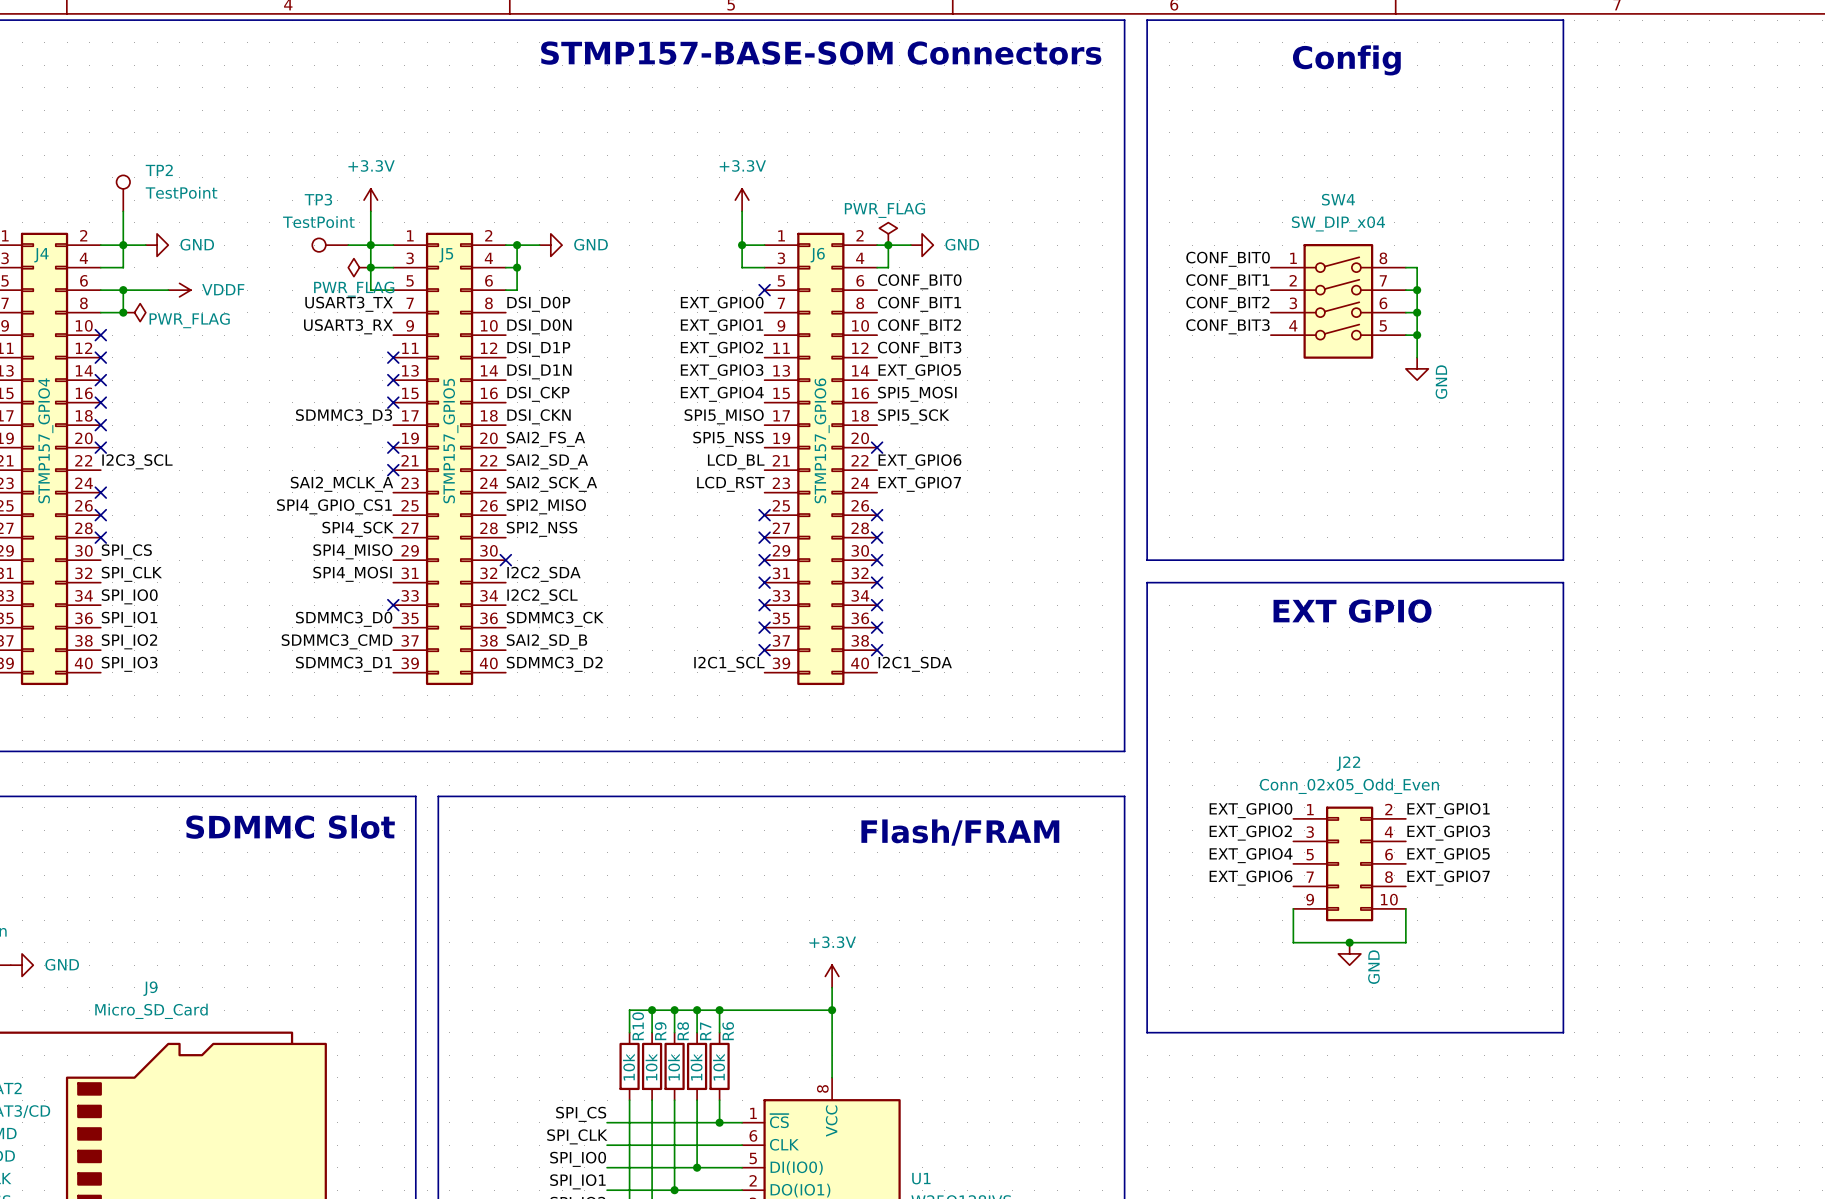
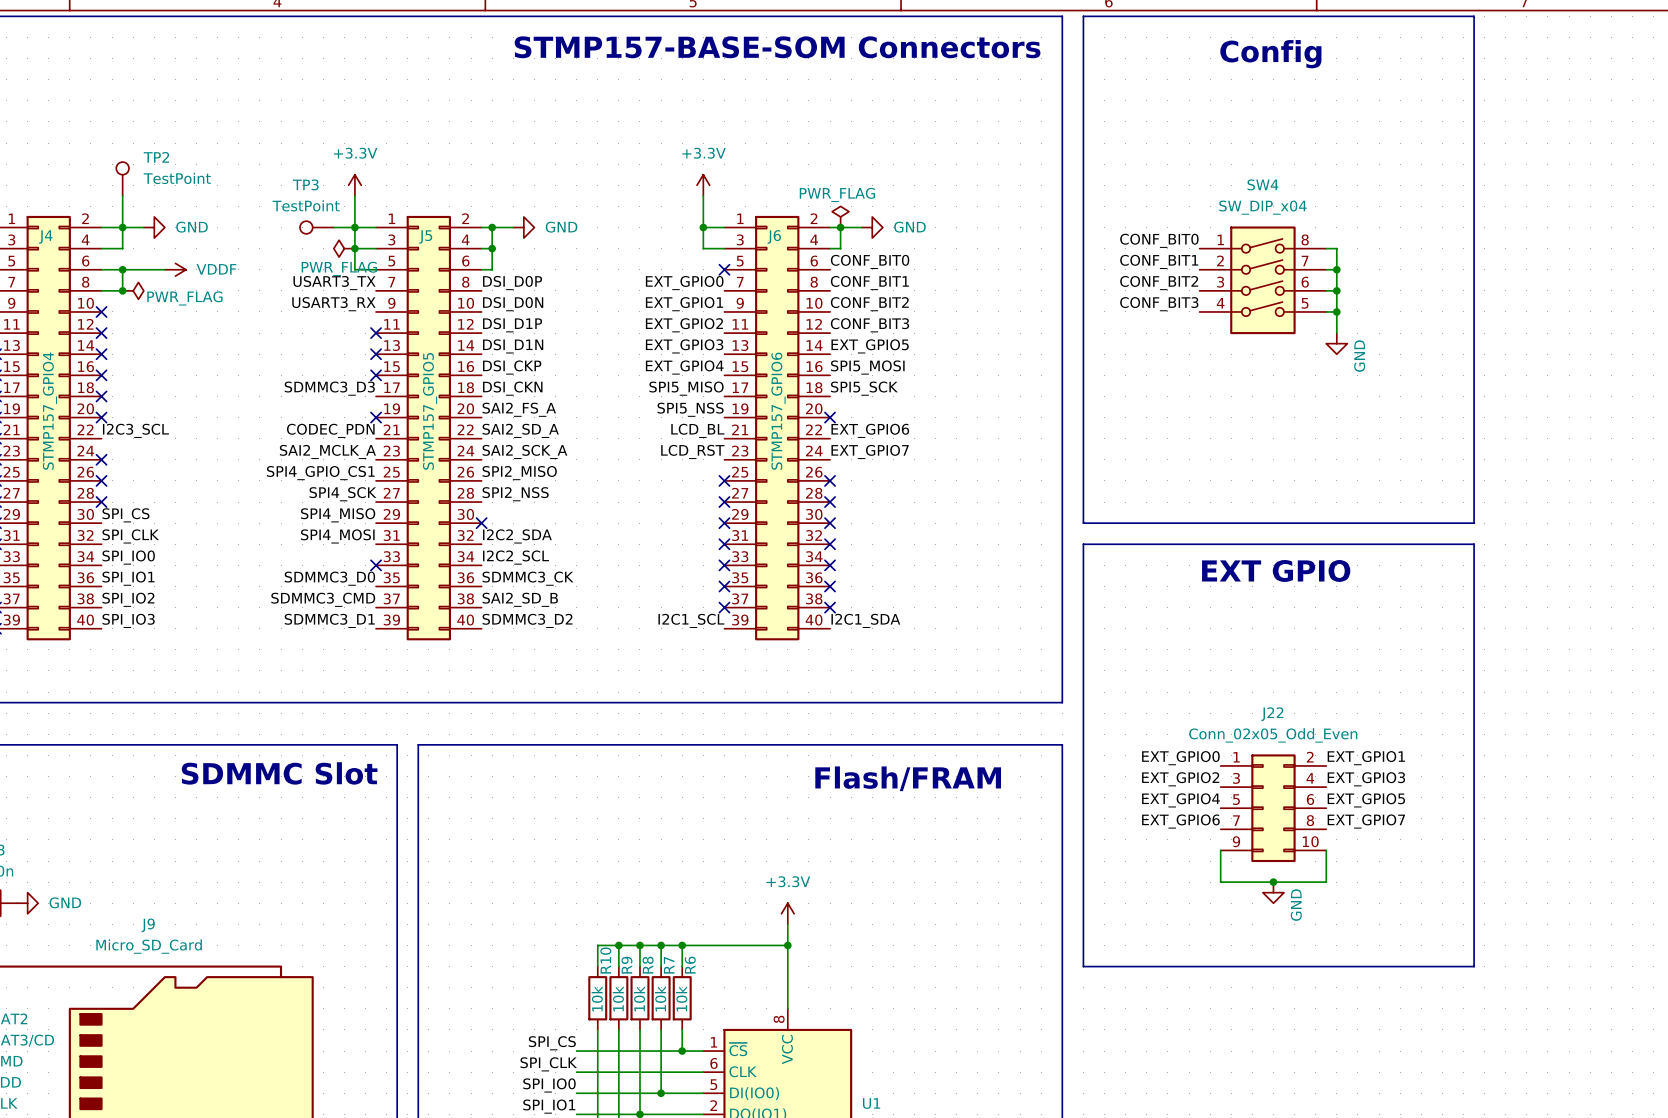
label: none -> CODEC_PDN (330, 430)
no-connect mark: (393, 470) -> none

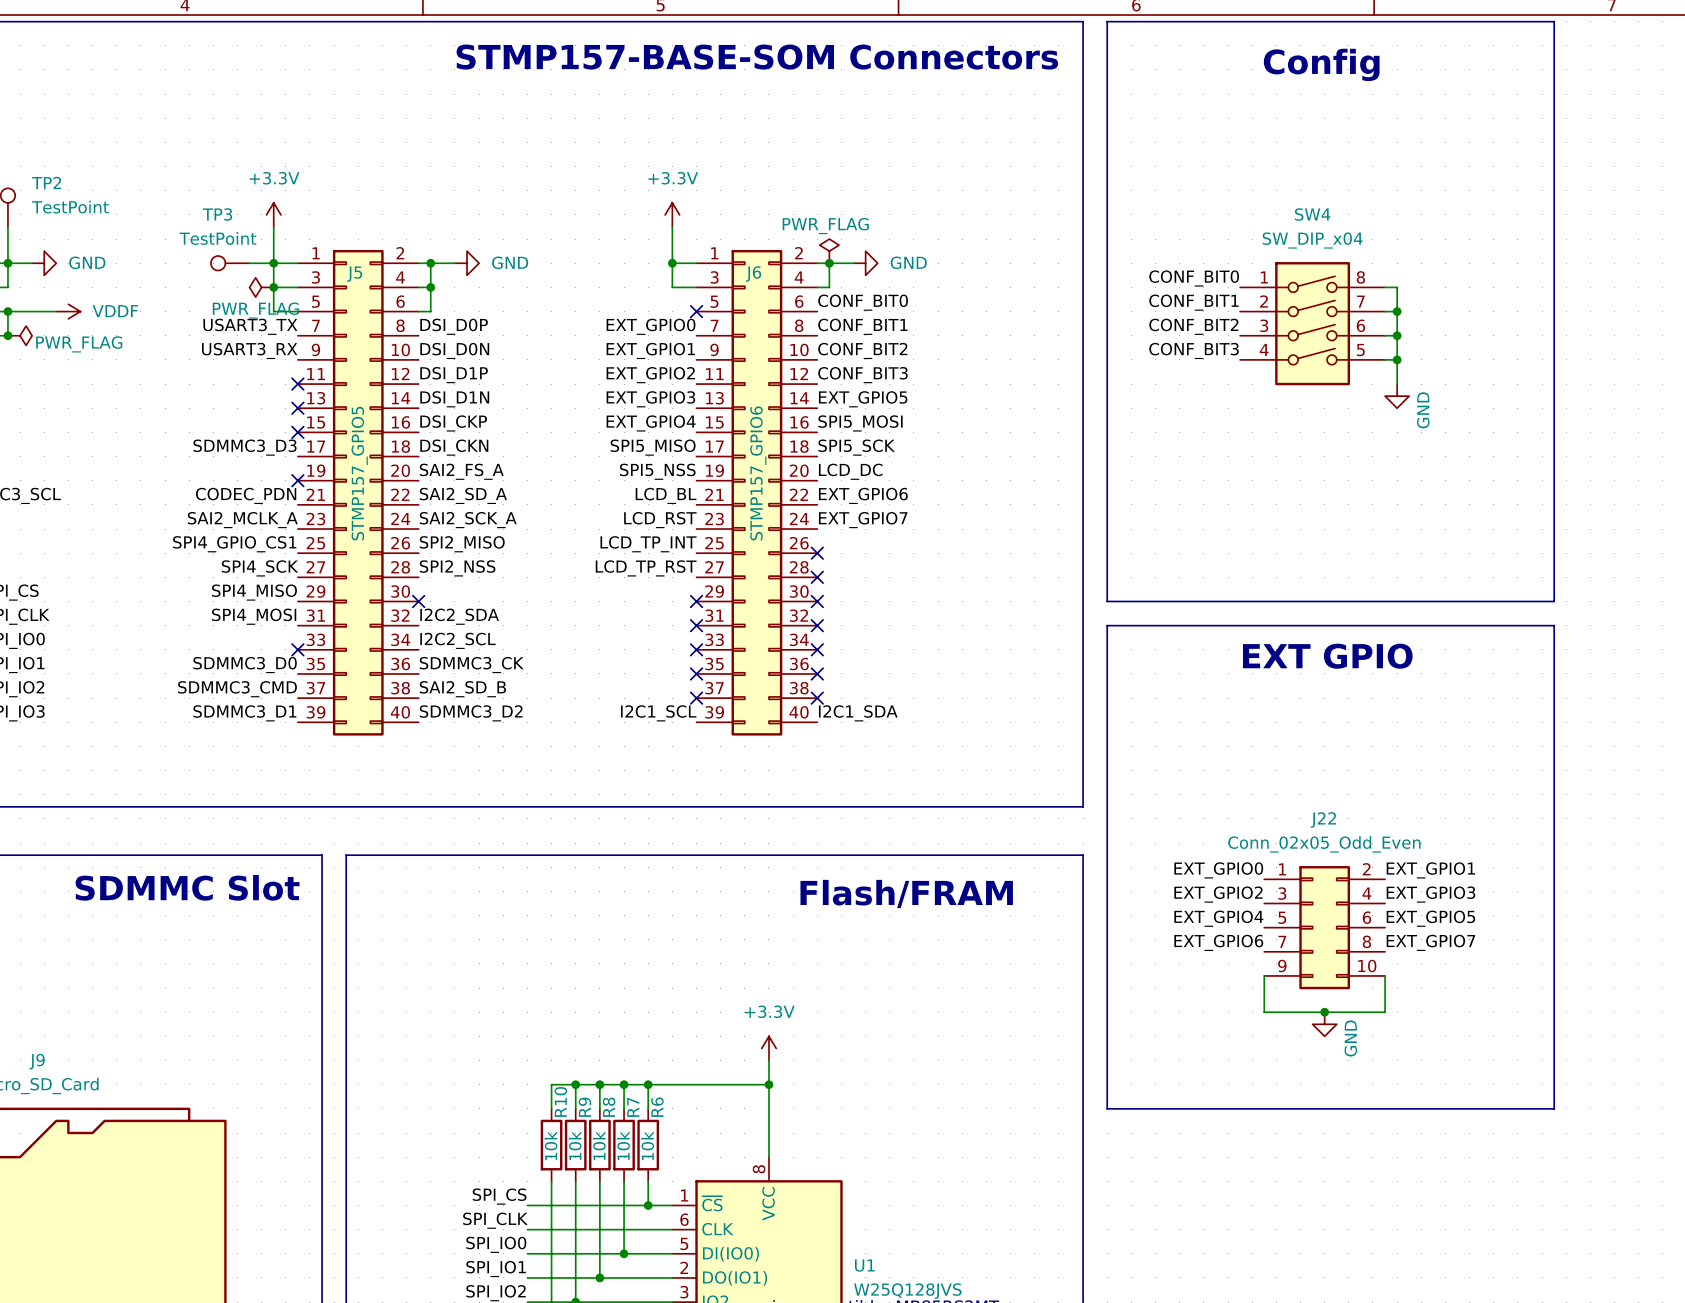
label: none -> LCD_DC (850, 471)
no-connect mark: (830, 417) -> none
label: none -> LCD_TP_INT (648, 544)
no-connect mark: (724, 480) -> none
label: none -> LCD_TP_RST (646, 568)
no-connect mark: (724, 502) -> none

